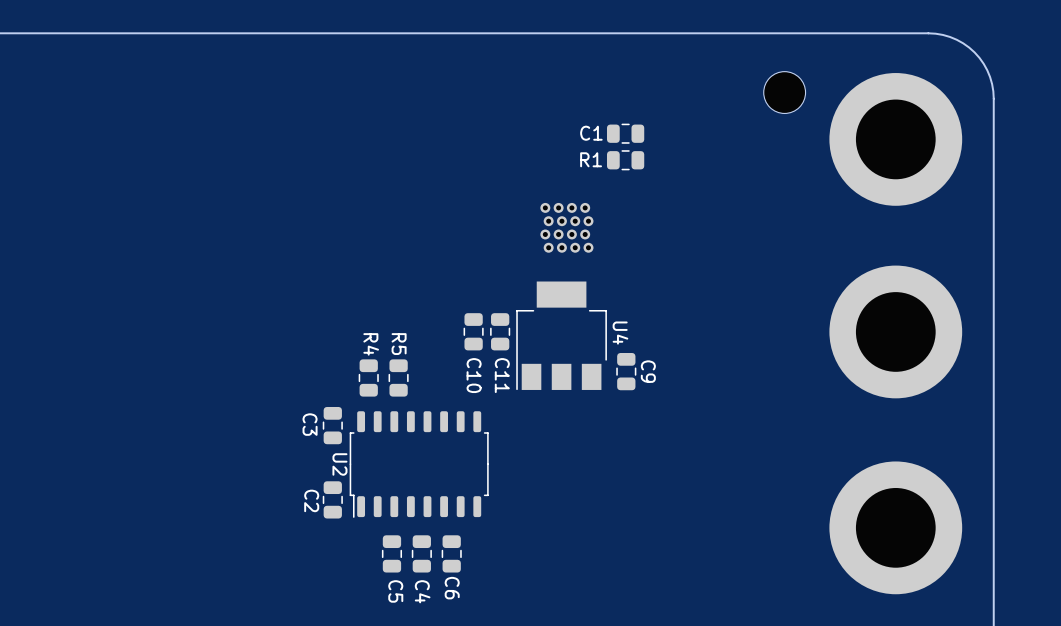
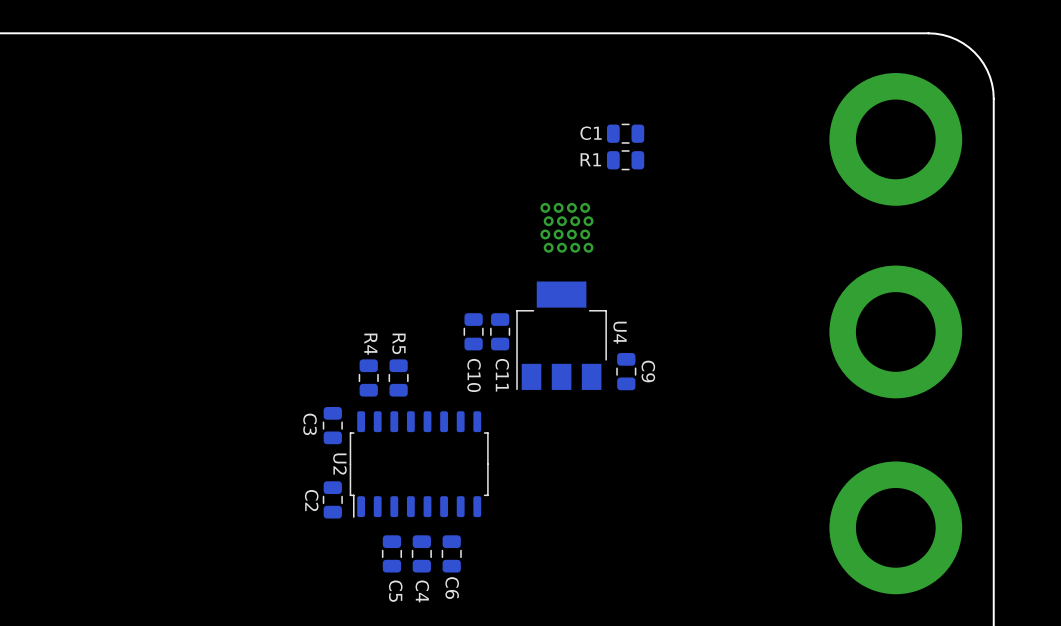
part: (784, 92) -> none

